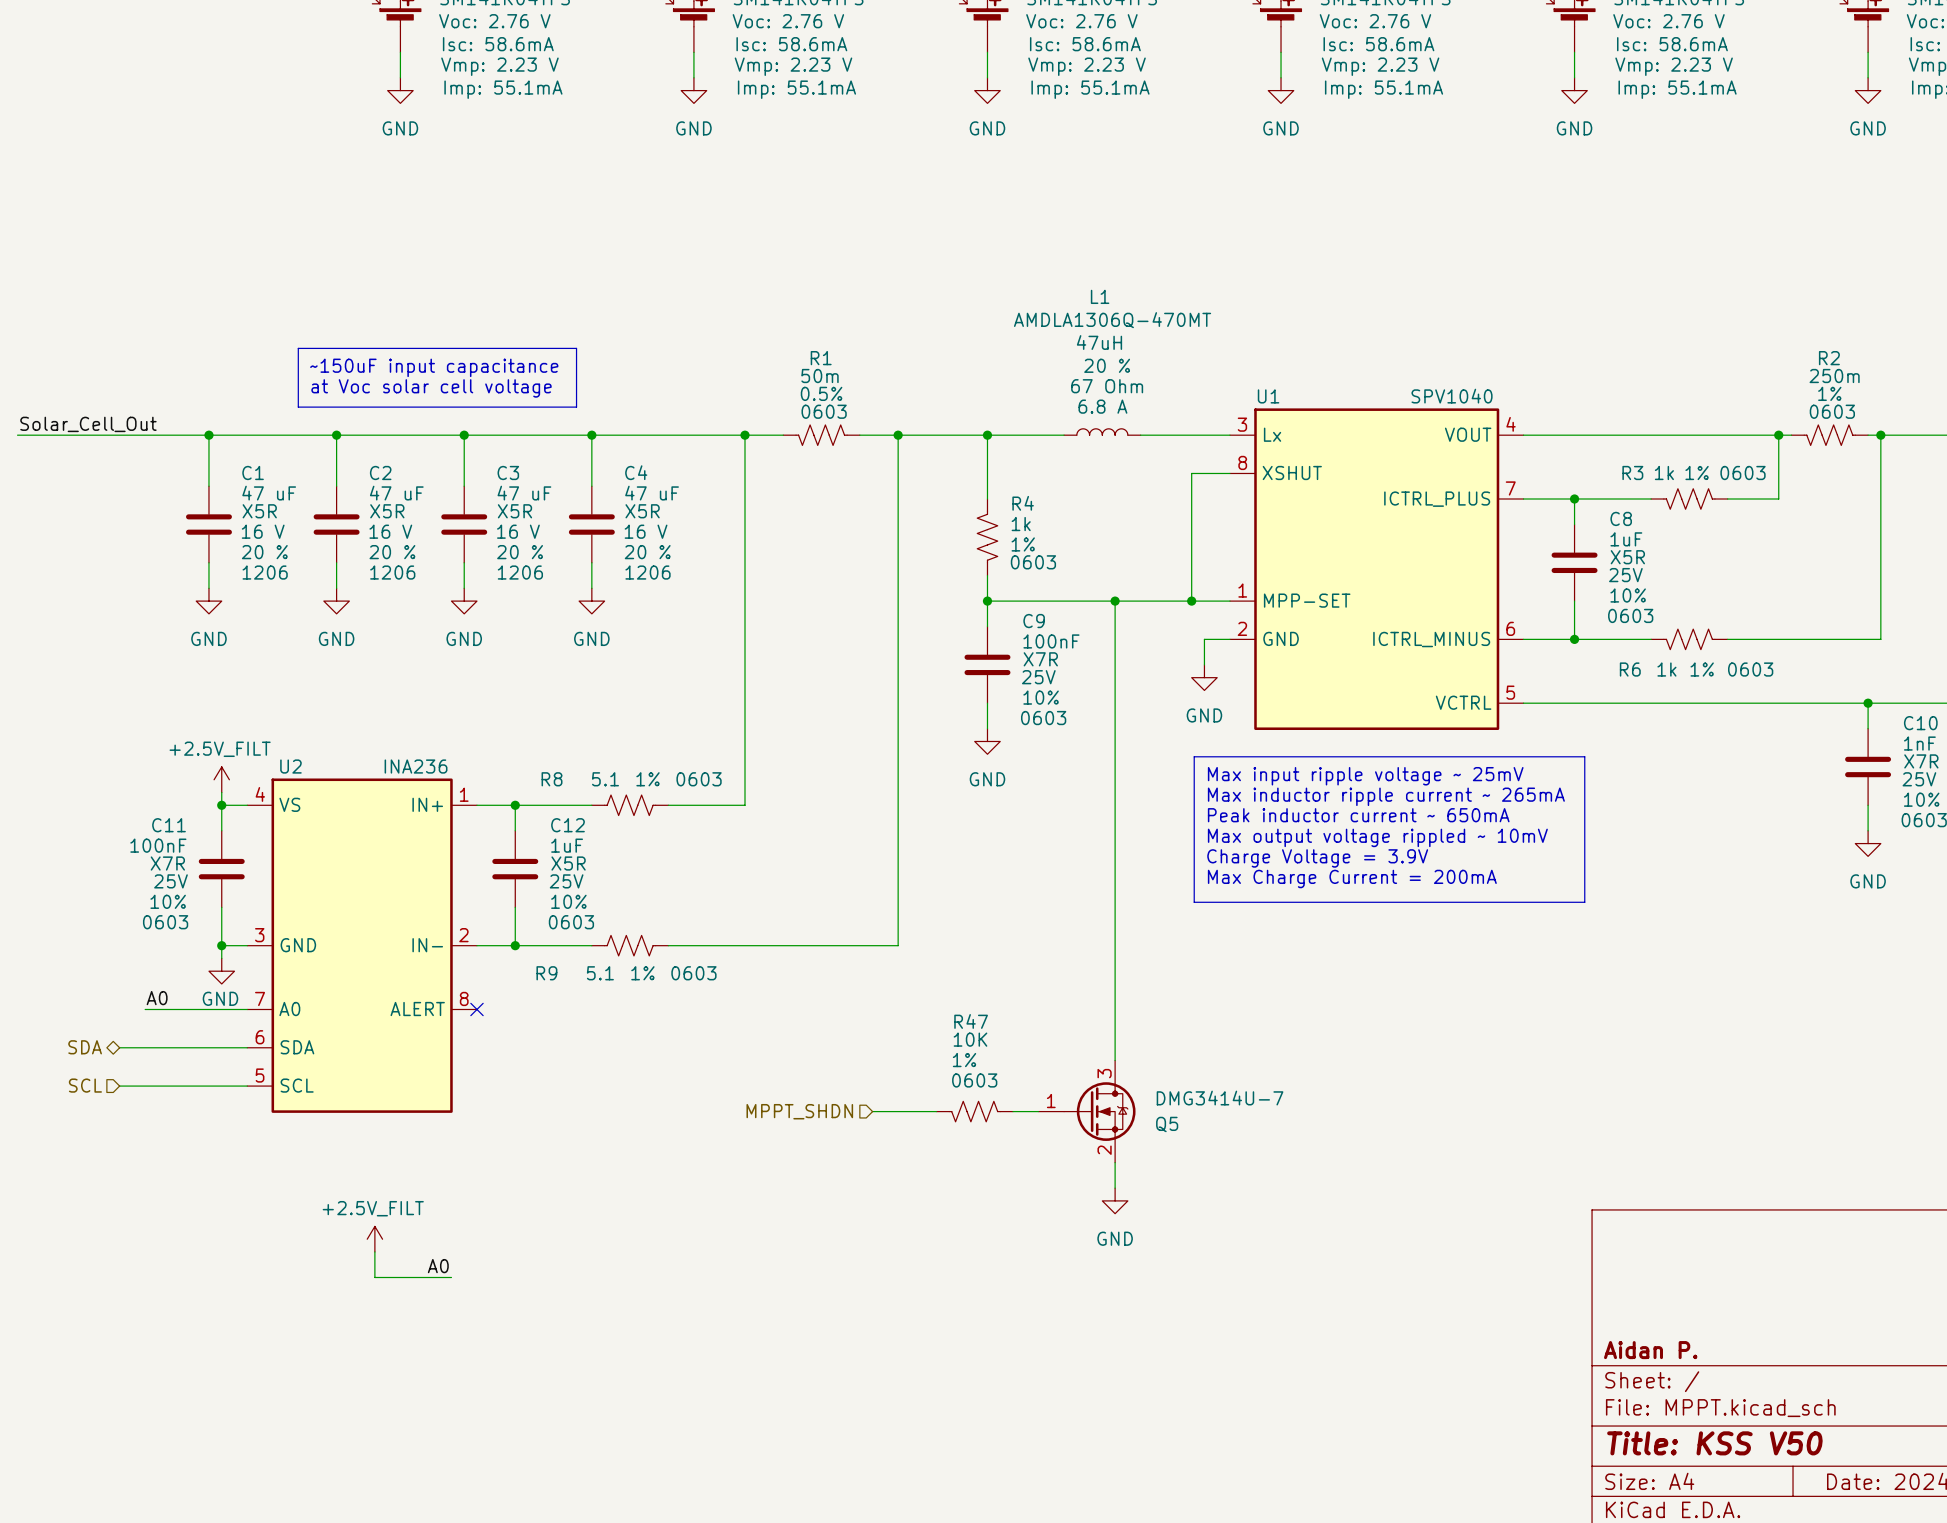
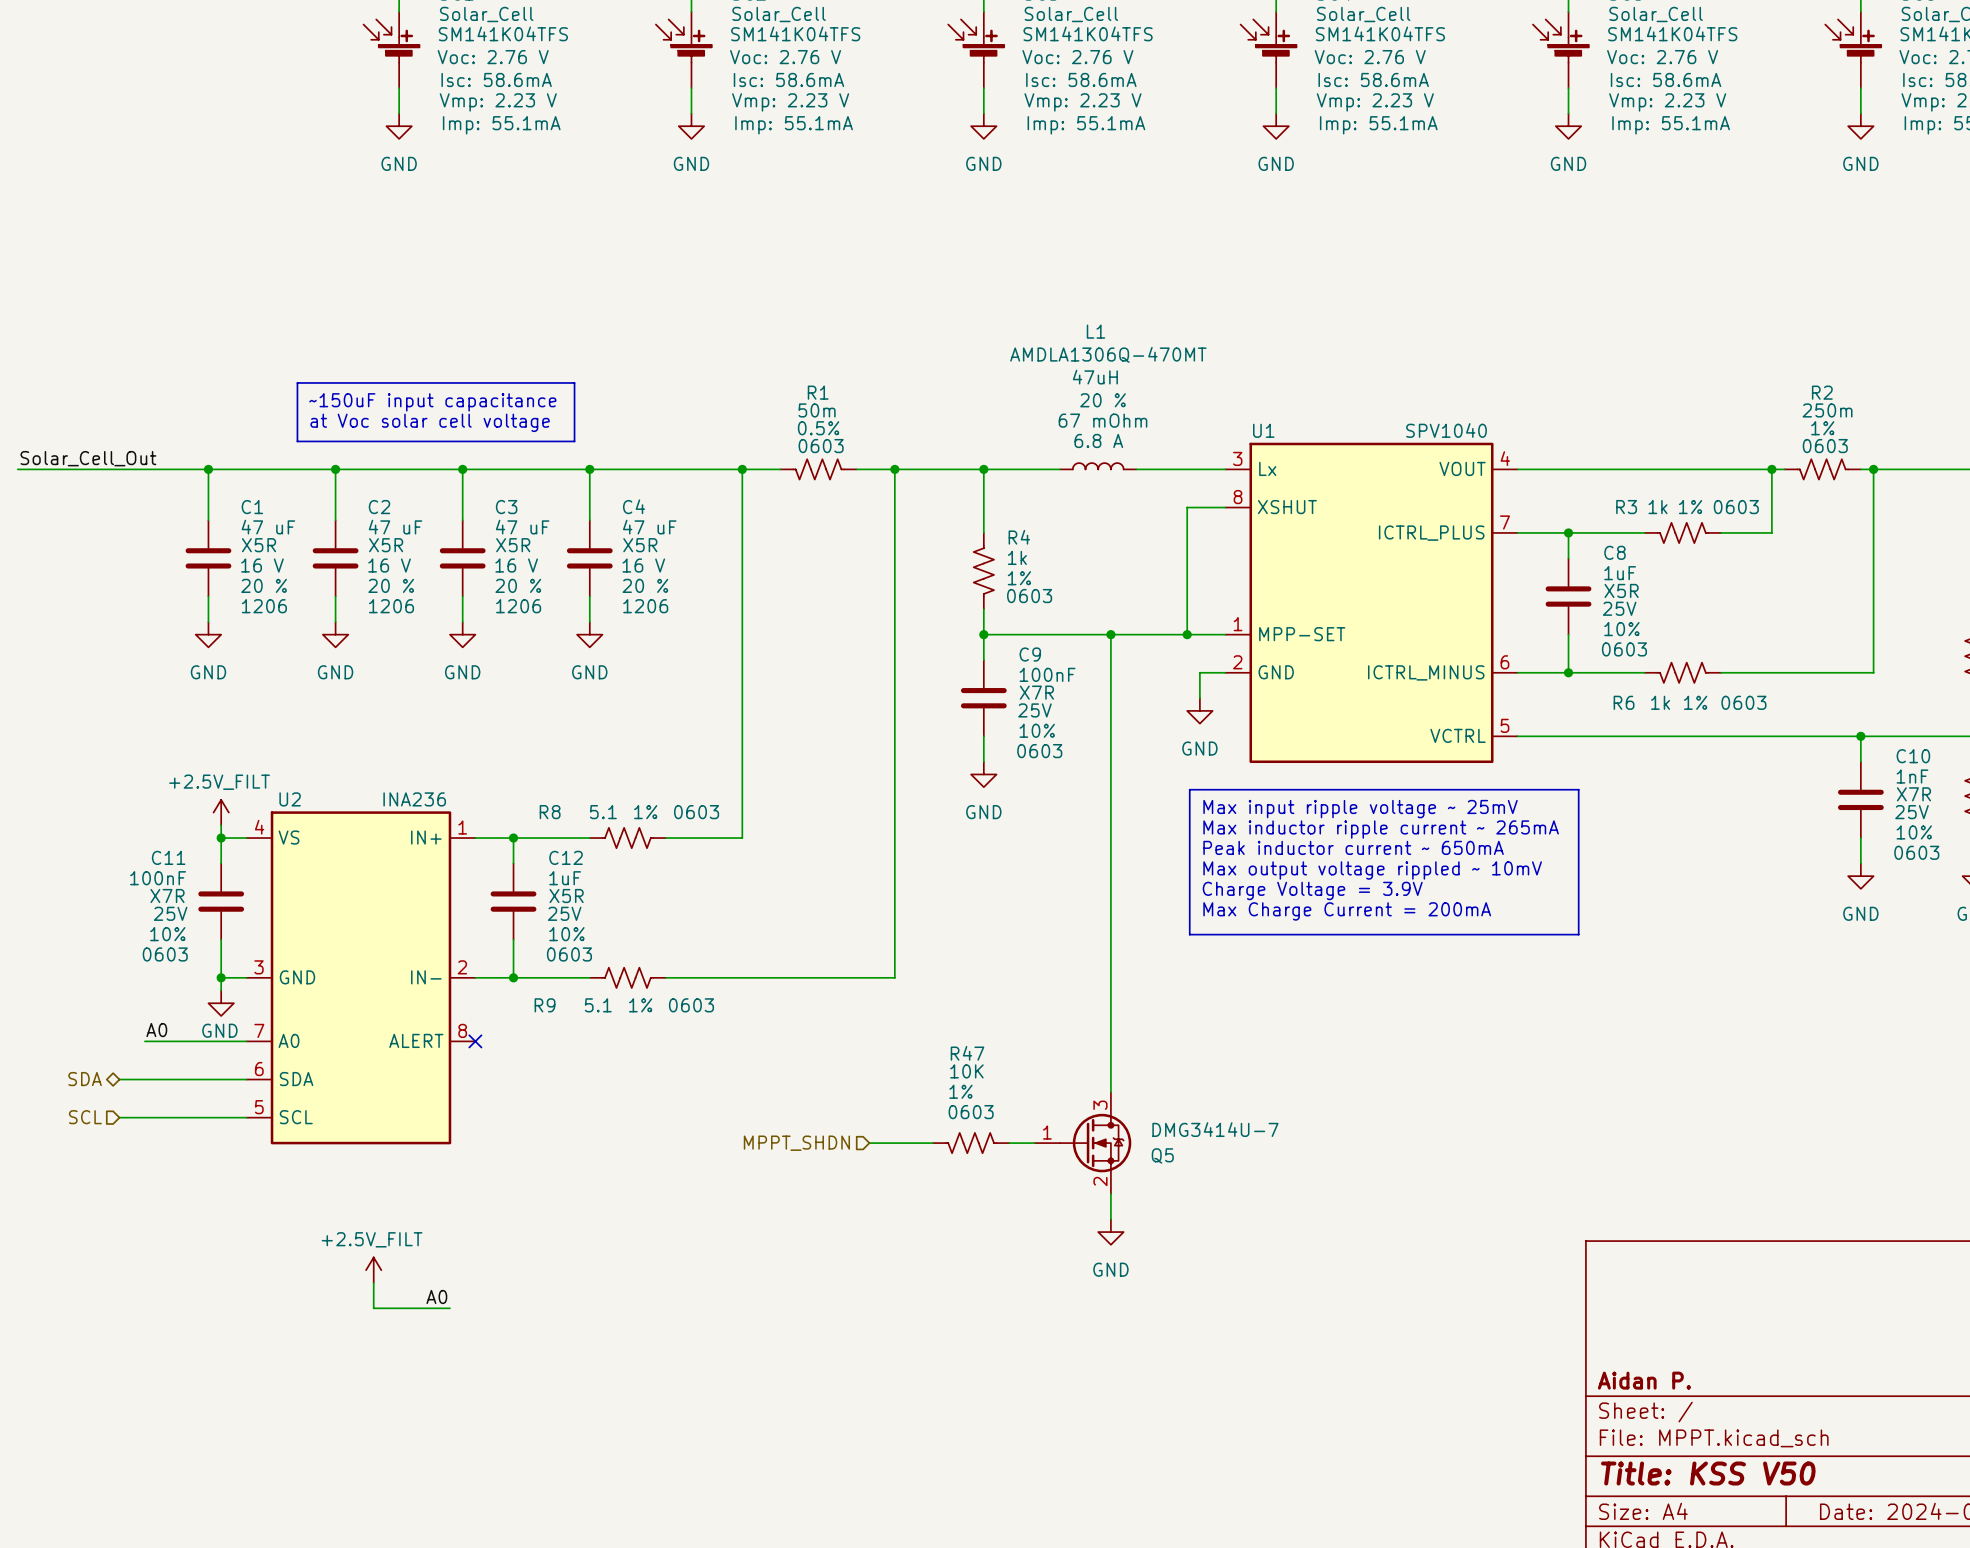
L1 text: 67 Ohm (1107, 386) -> 67 mOhm (1103, 420)

